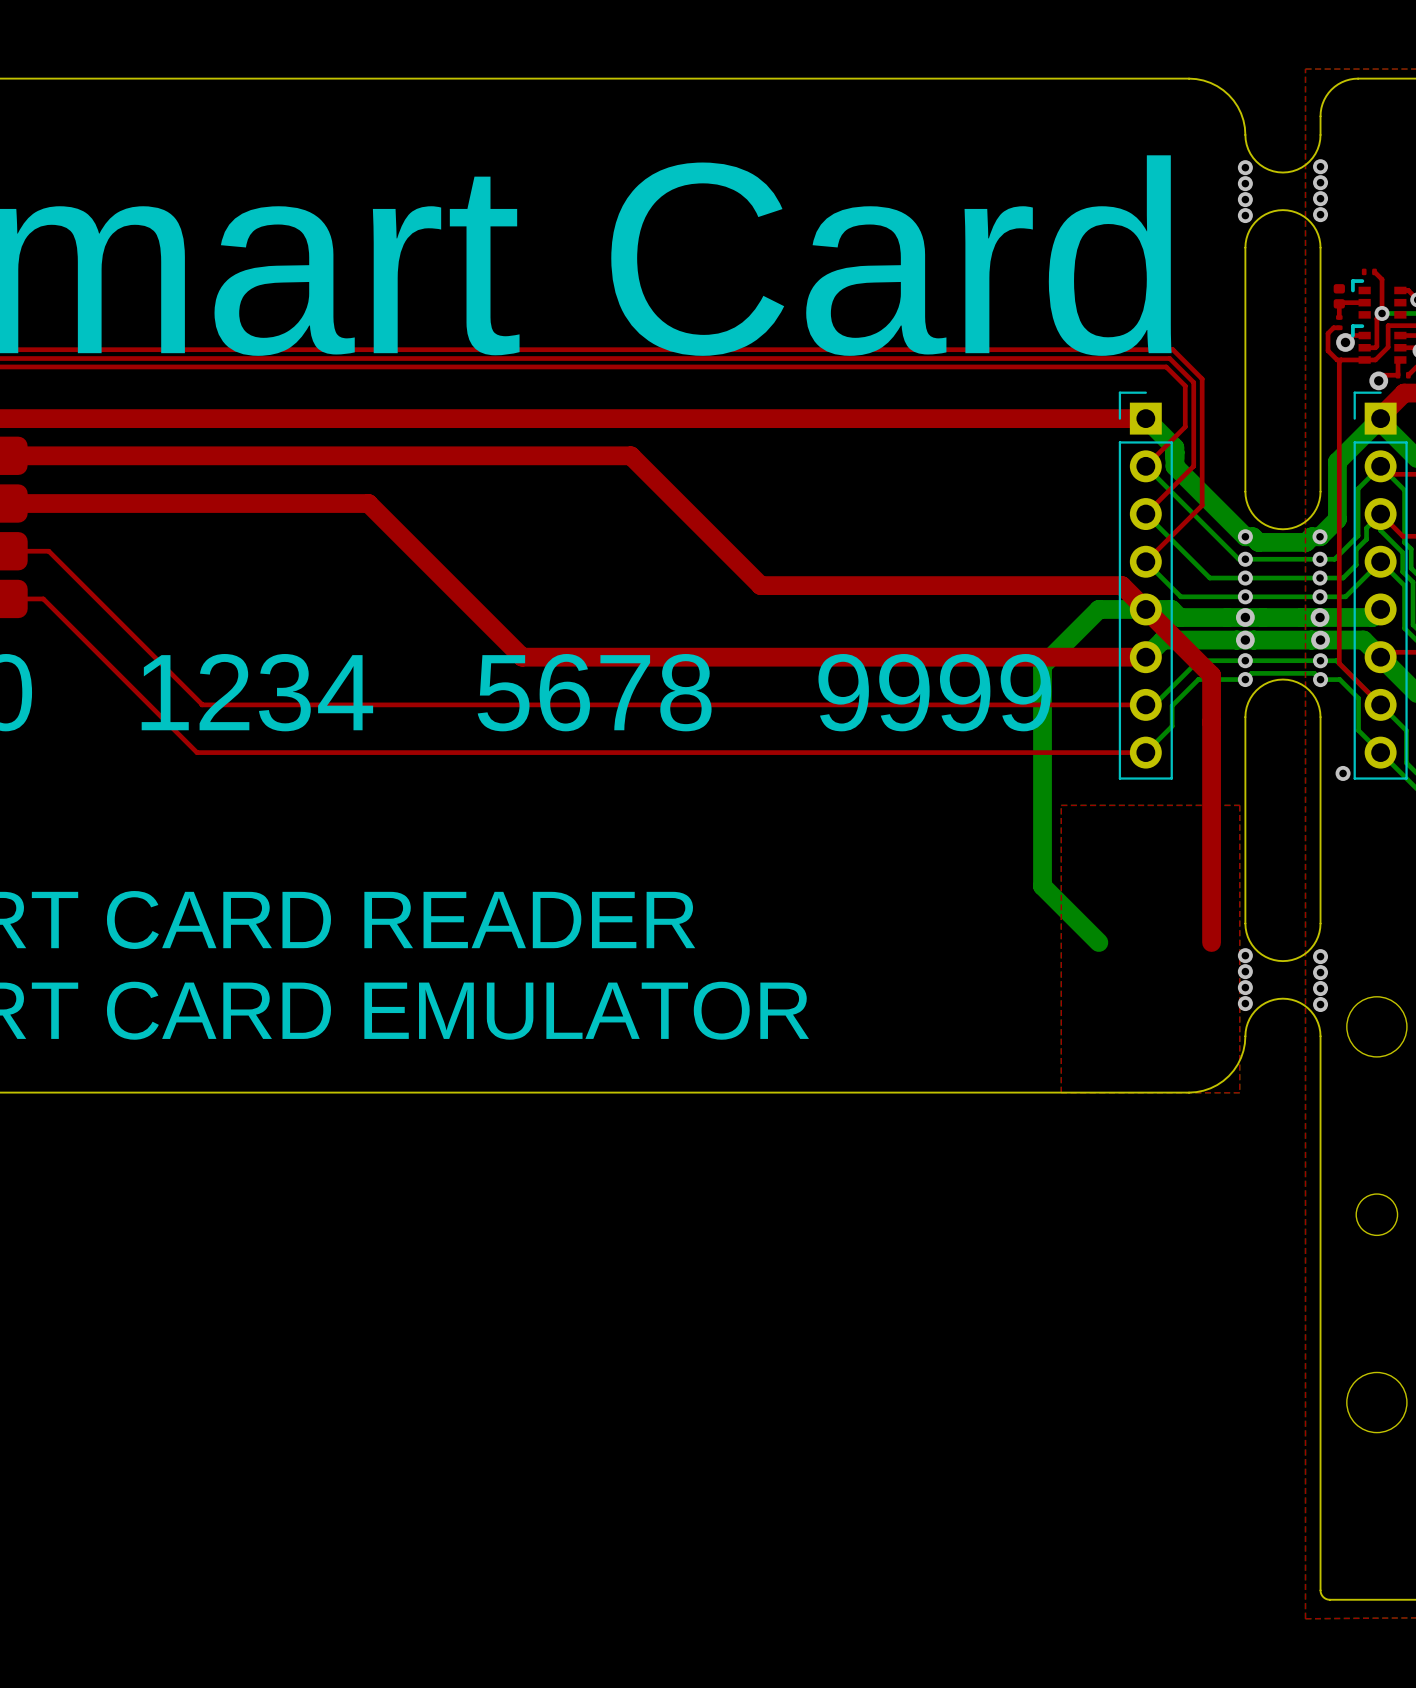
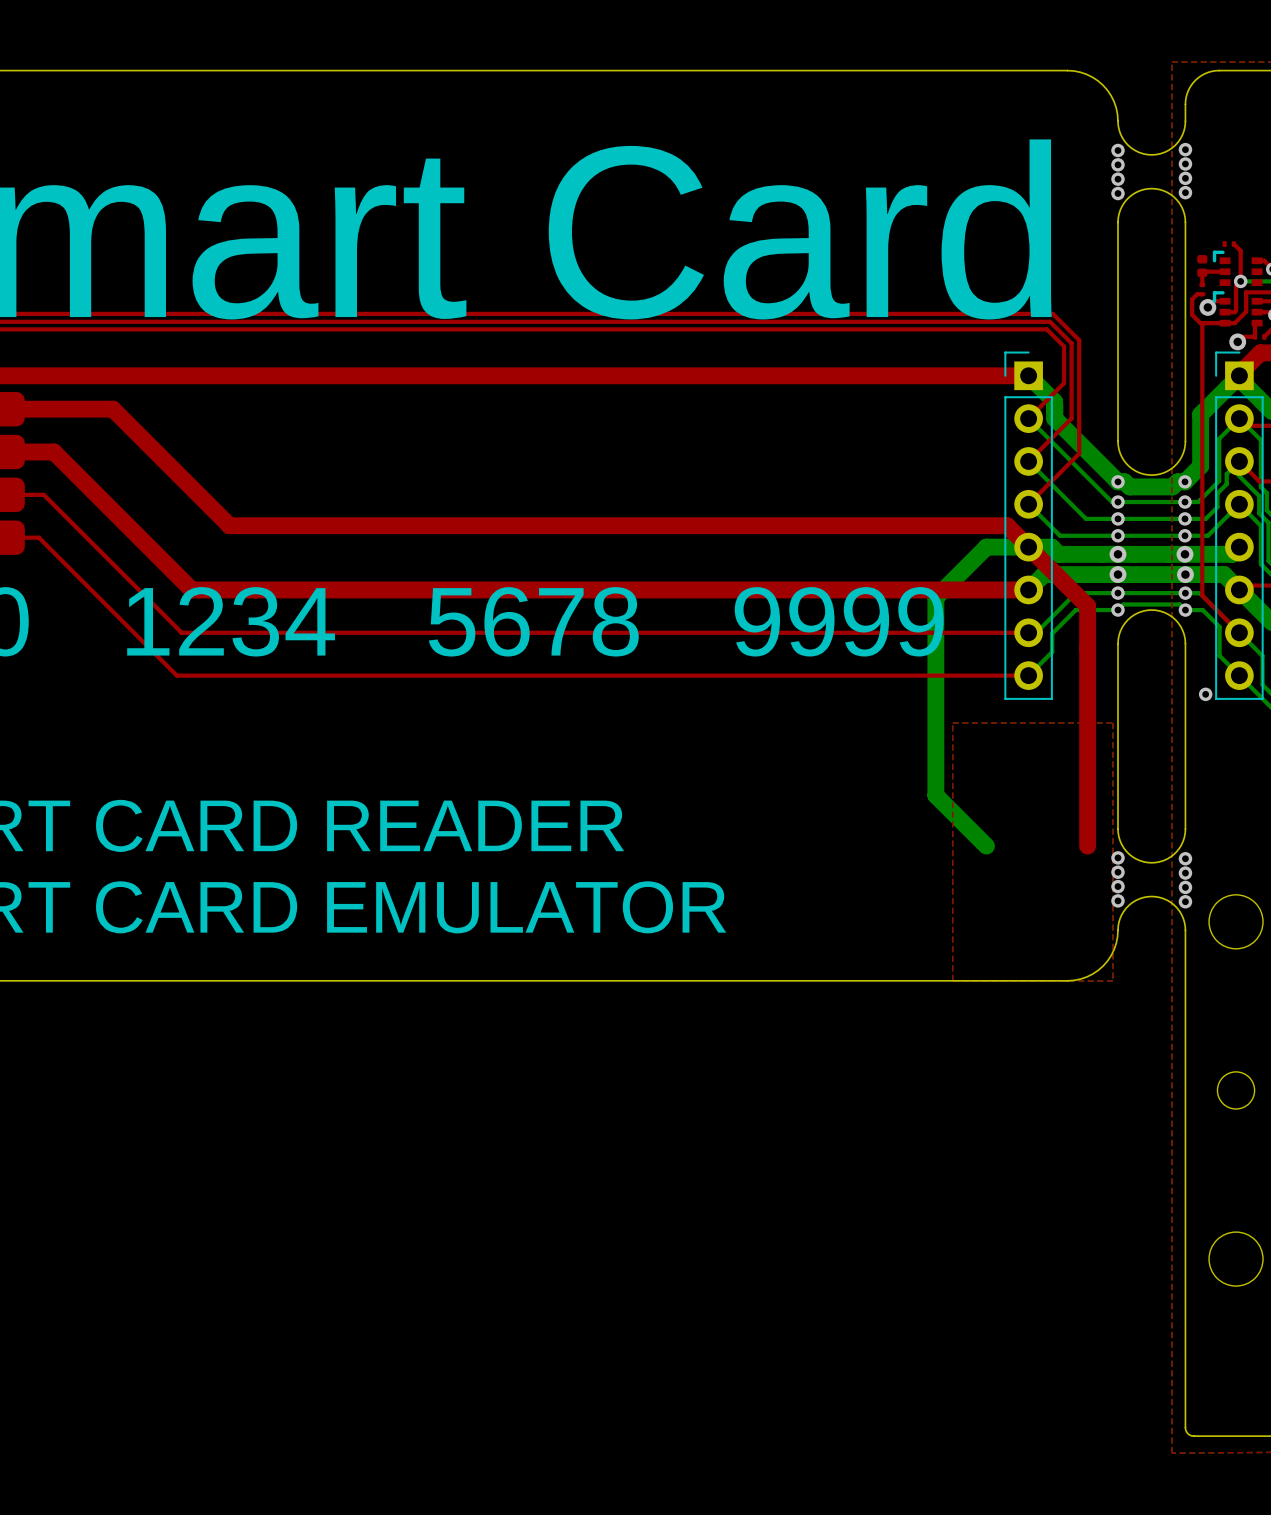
top track: (125, 455) (630, 455) (760, 585) -> (112, 409) (229, 525) (682, 525)
top track: (60, 503) (368, 503) (522, 657) -> (53, 452) (191, 589) (468, 589)

